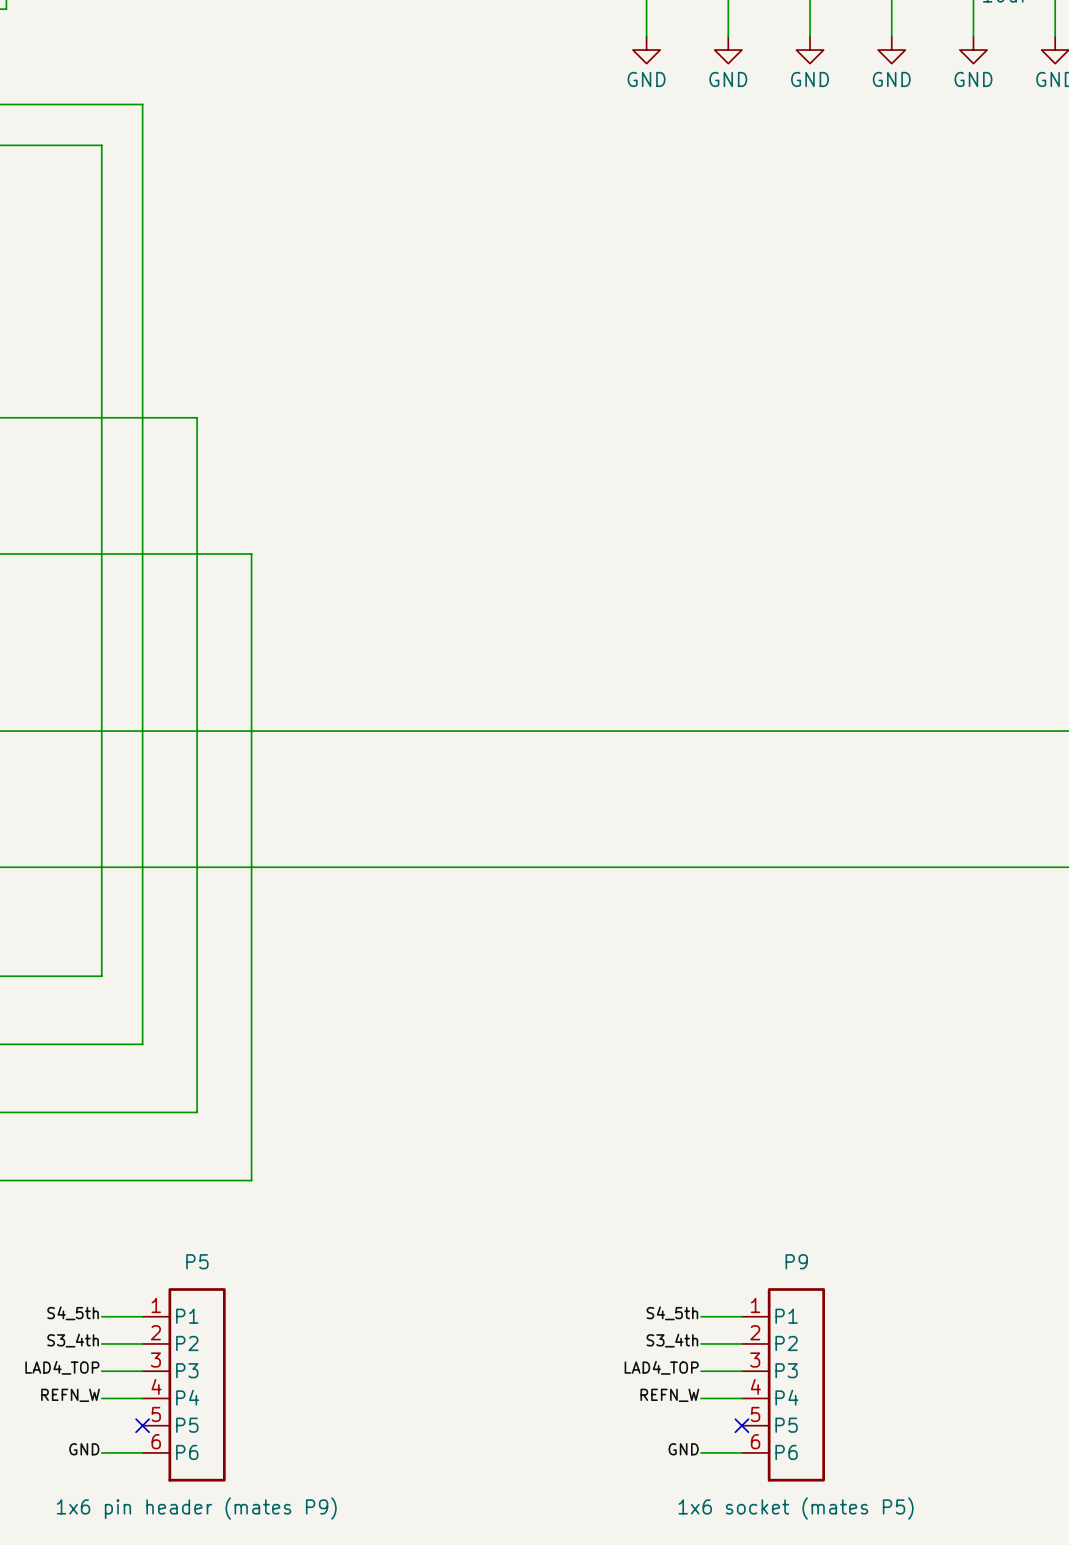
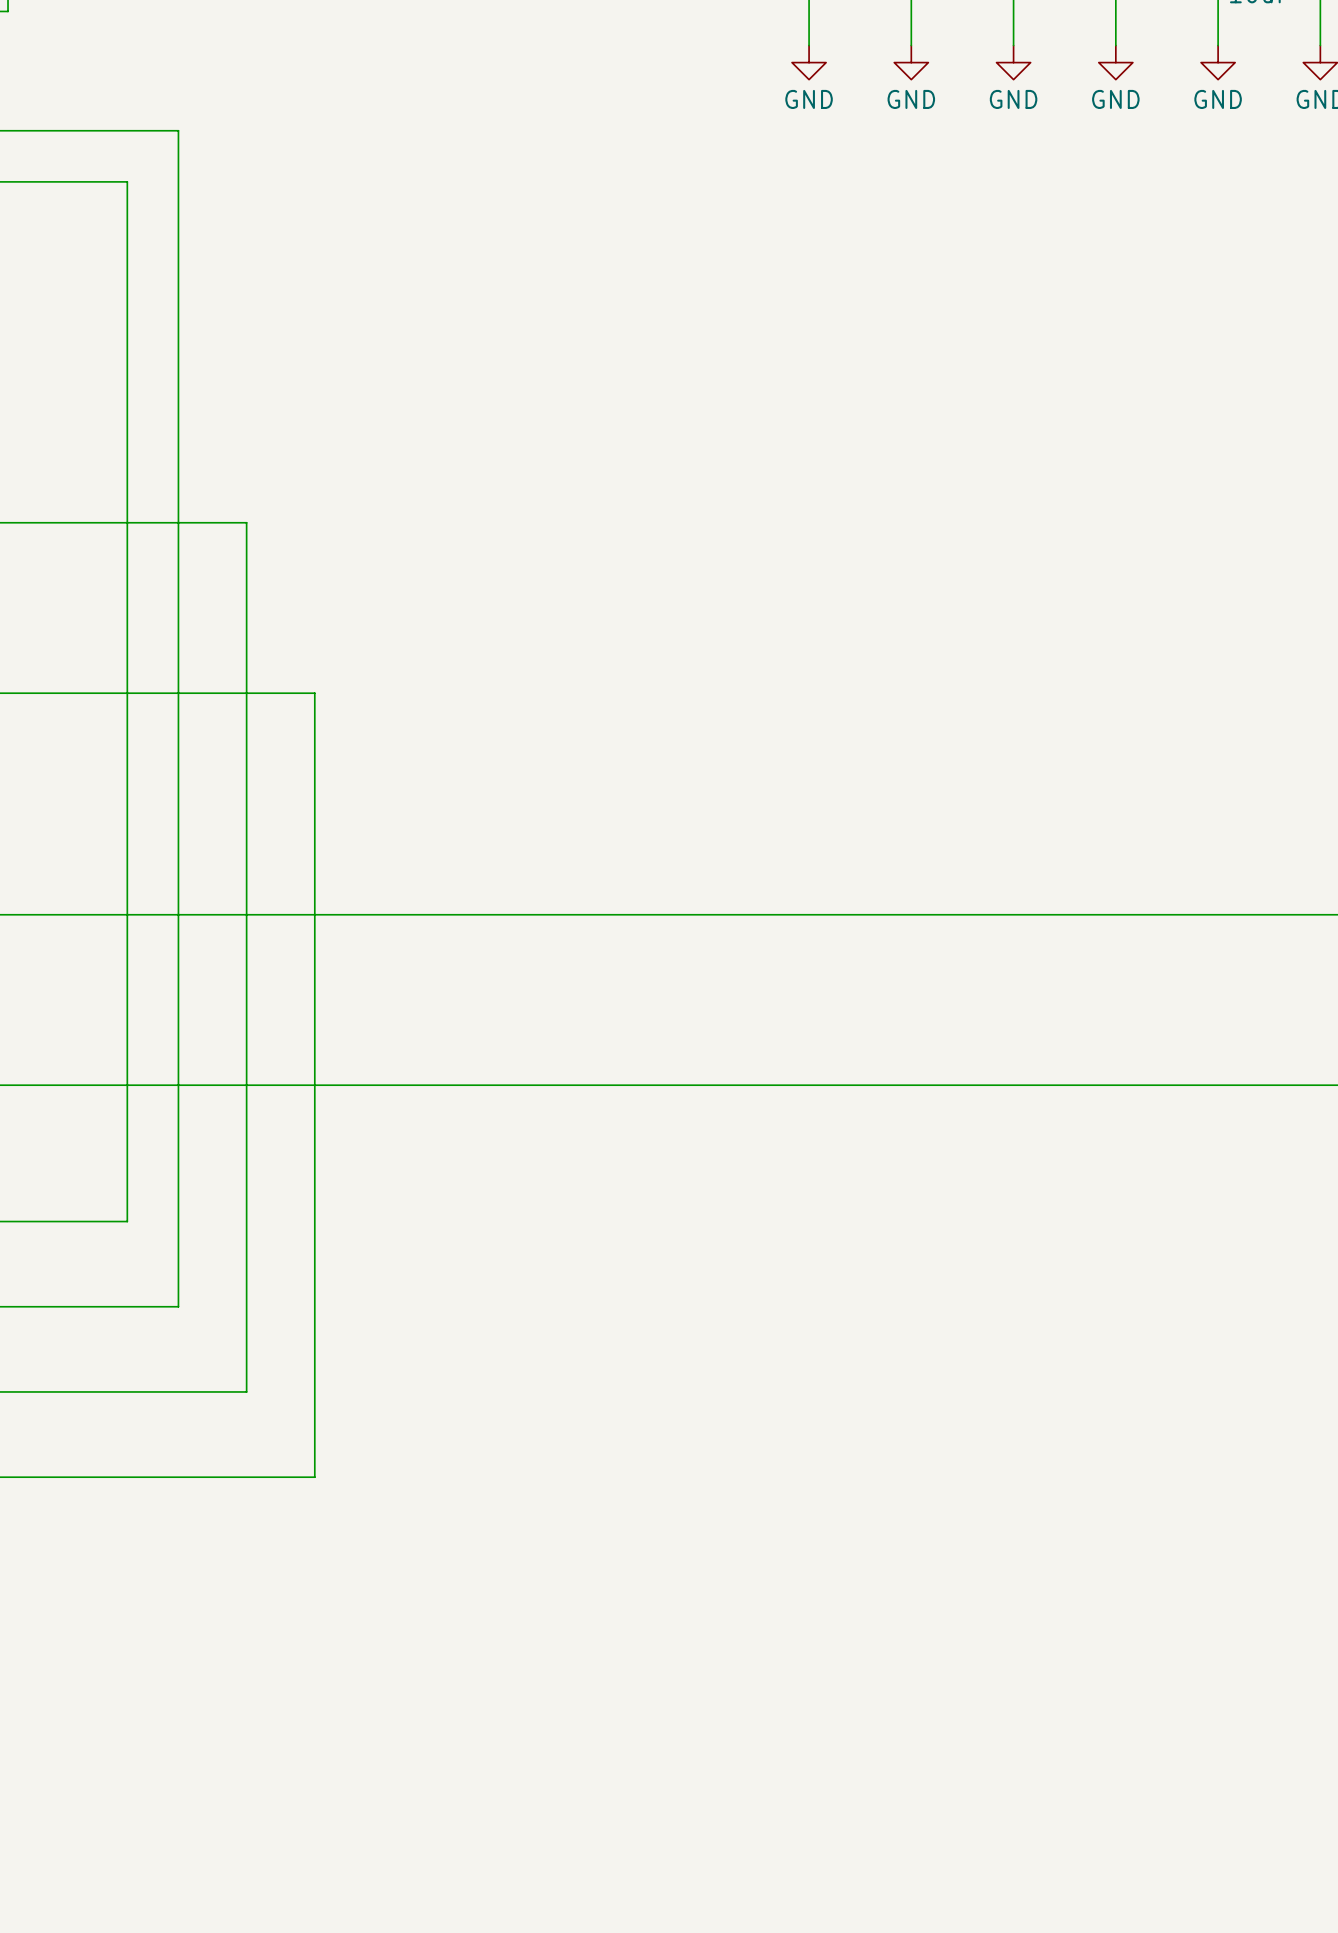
label: S4_5th (73, 1313) -> none
label: S4_5th (672, 1313) -> none
wire: (101, 1316) (142, 1316) -> none
wire: (701, 1316) (741, 1316) -> none
label: S3_4th (73, 1340) -> none
label: S3_4th (672, 1340) -> none
wire: (101, 1343) (142, 1343) -> none
wire: (701, 1343) (741, 1343) -> none
label: LAD4_TOP (62, 1367) -> none
label: LAD4_TOP (661, 1367) -> none
wire: (101, 1371) (142, 1371) -> none
wire: (701, 1371) (741, 1371) -> none
P5: 1x6 pin header (mates P9) (184, 1384) -> none
P9: 1x6 socket (mates P5) (783, 1384) -> none
label: REFN_W (70, 1395) -> none
label: REFN_W (669, 1395) -> none
wire: (101, 1398) (142, 1398) -> none
wire: (701, 1398) (741, 1398) -> none
no-connect mark: (142, 1425) -> none
no-connect mark: (741, 1425) -> none
label: GND (84, 1449) -> none
label: GND (683, 1449) -> none
wire: (101, 1452) (142, 1452) -> none
wire: (701, 1452) (741, 1452) -> none

